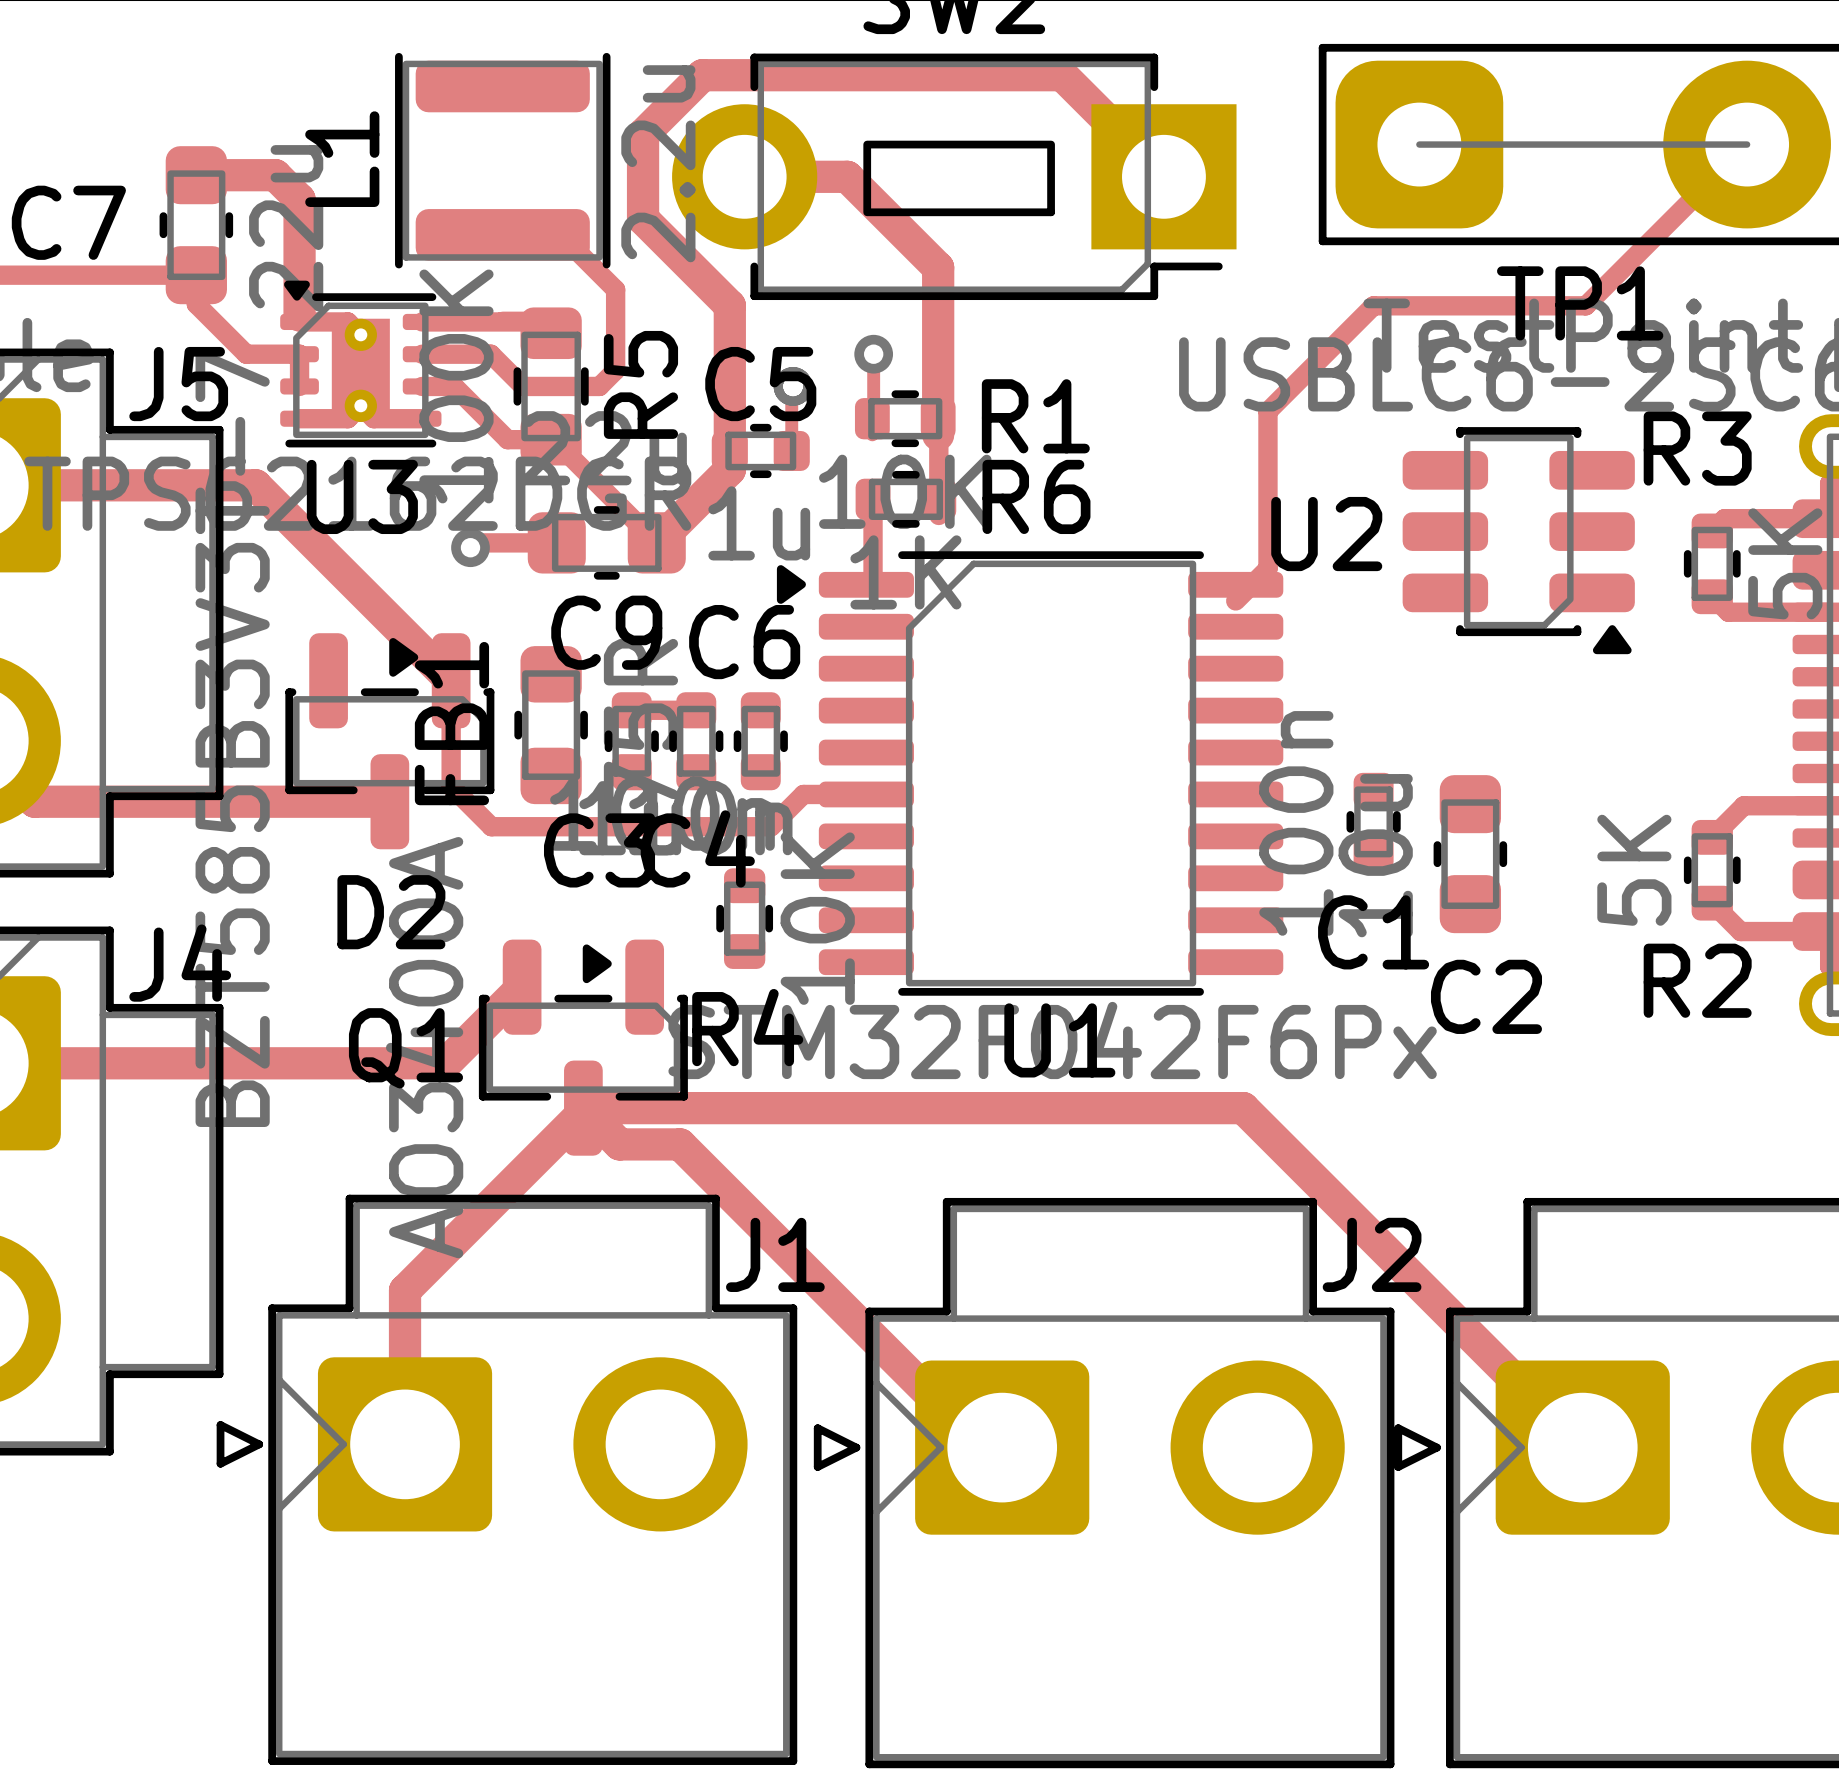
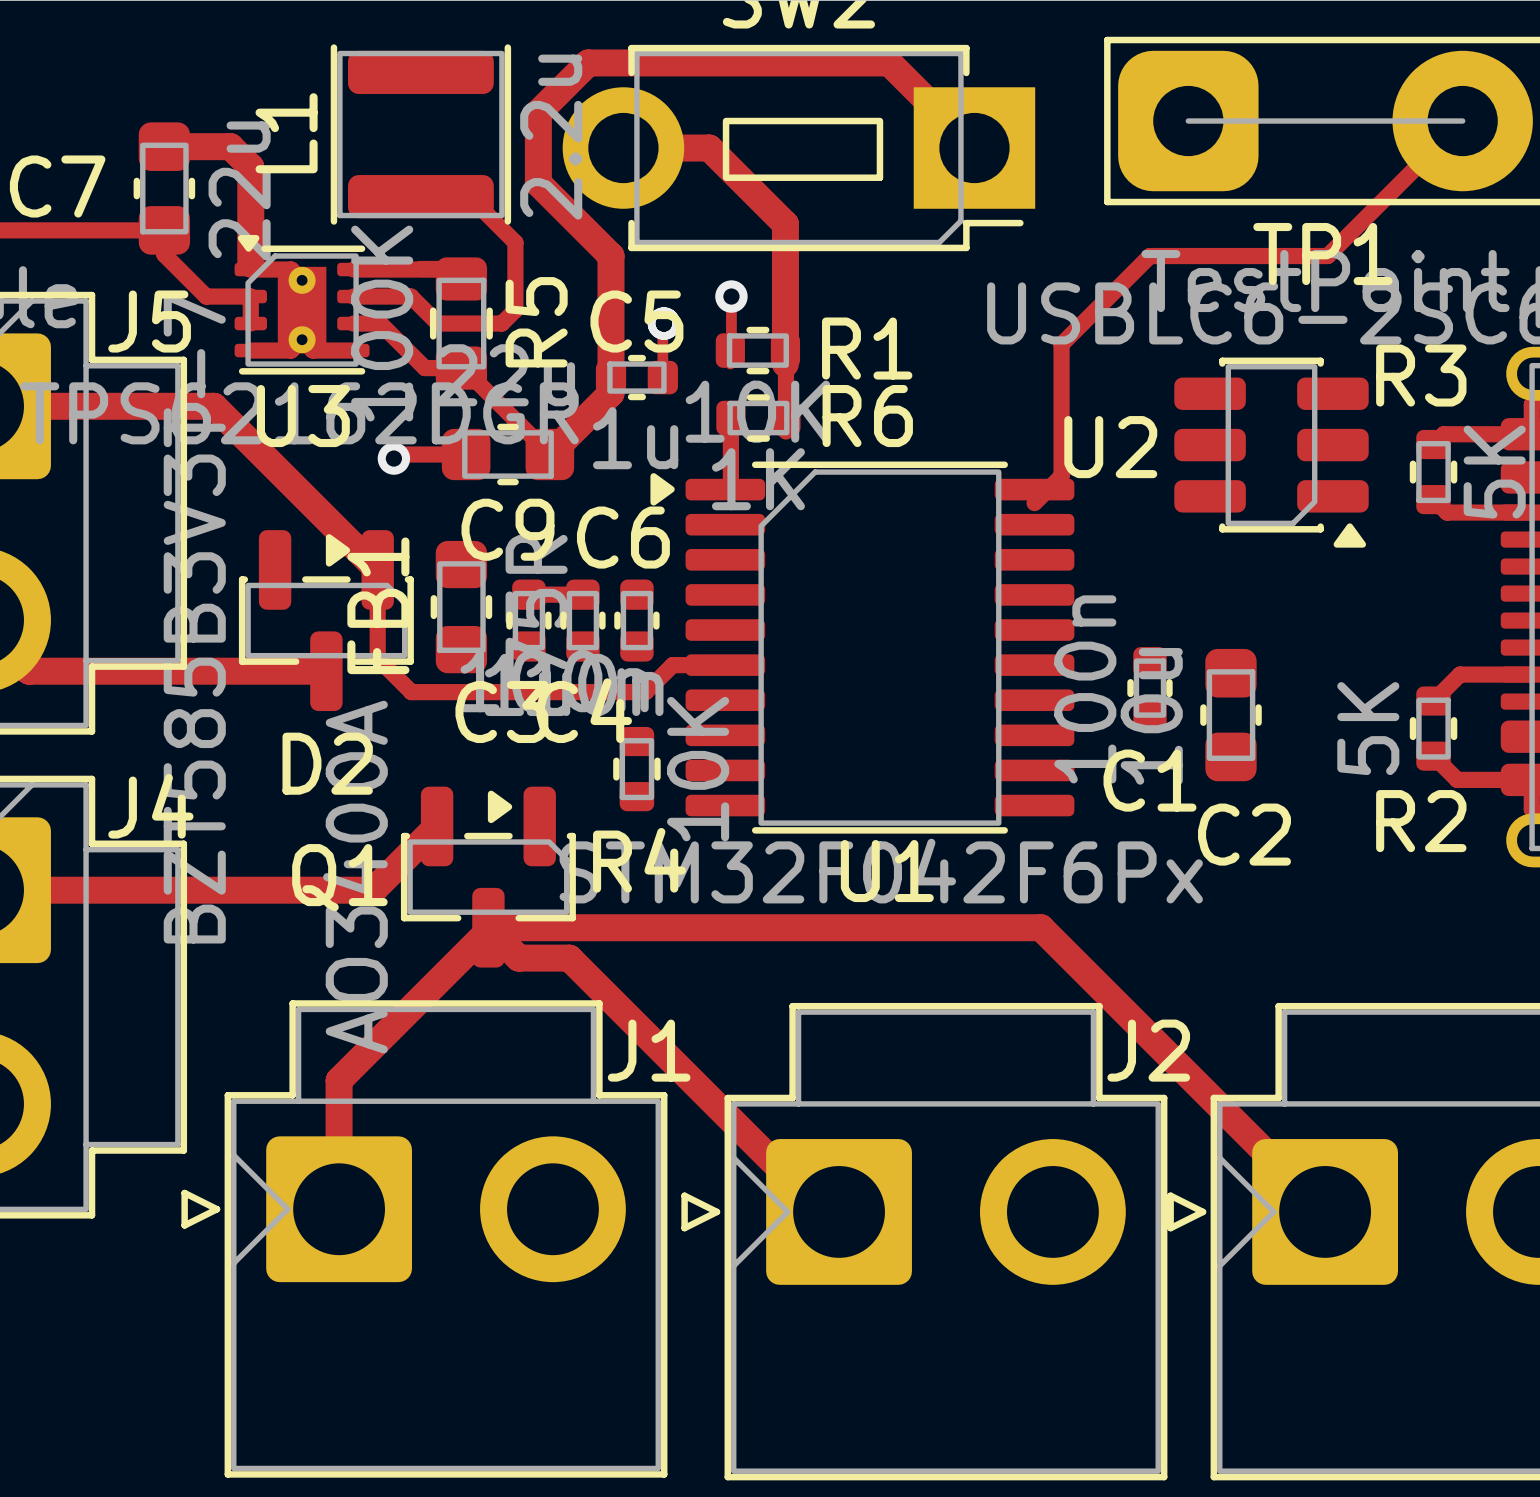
R4 position: (744, 918) -> (636, 769)

